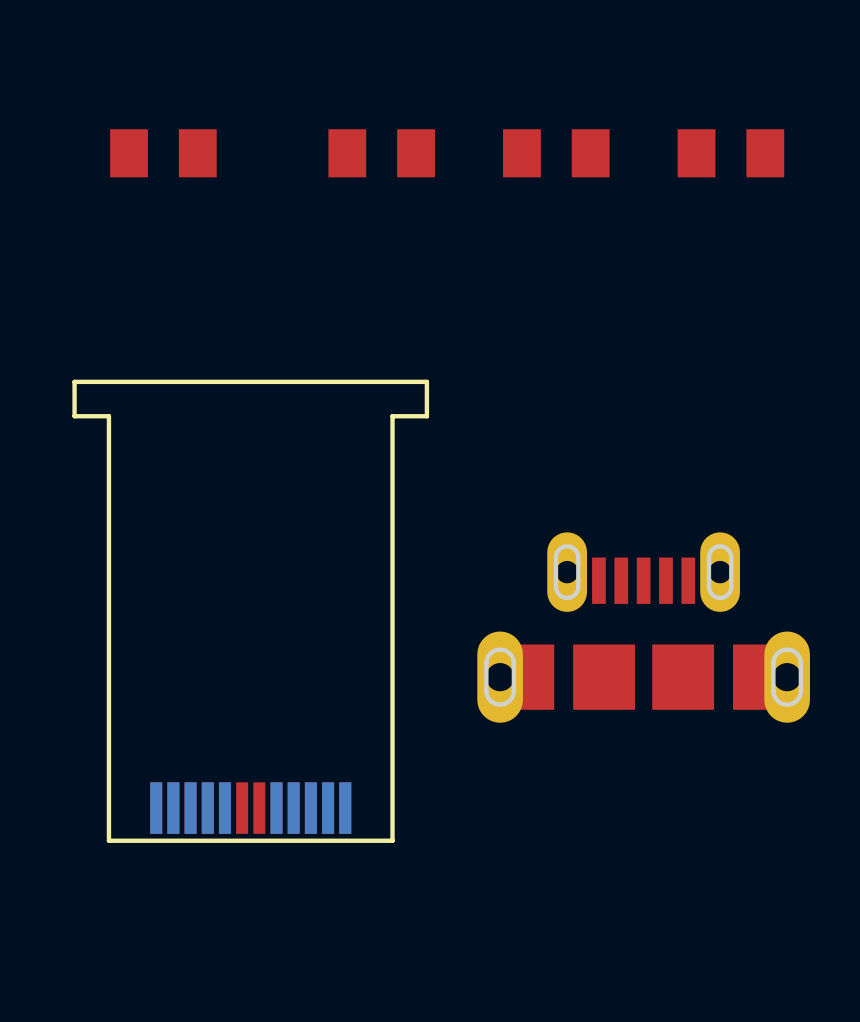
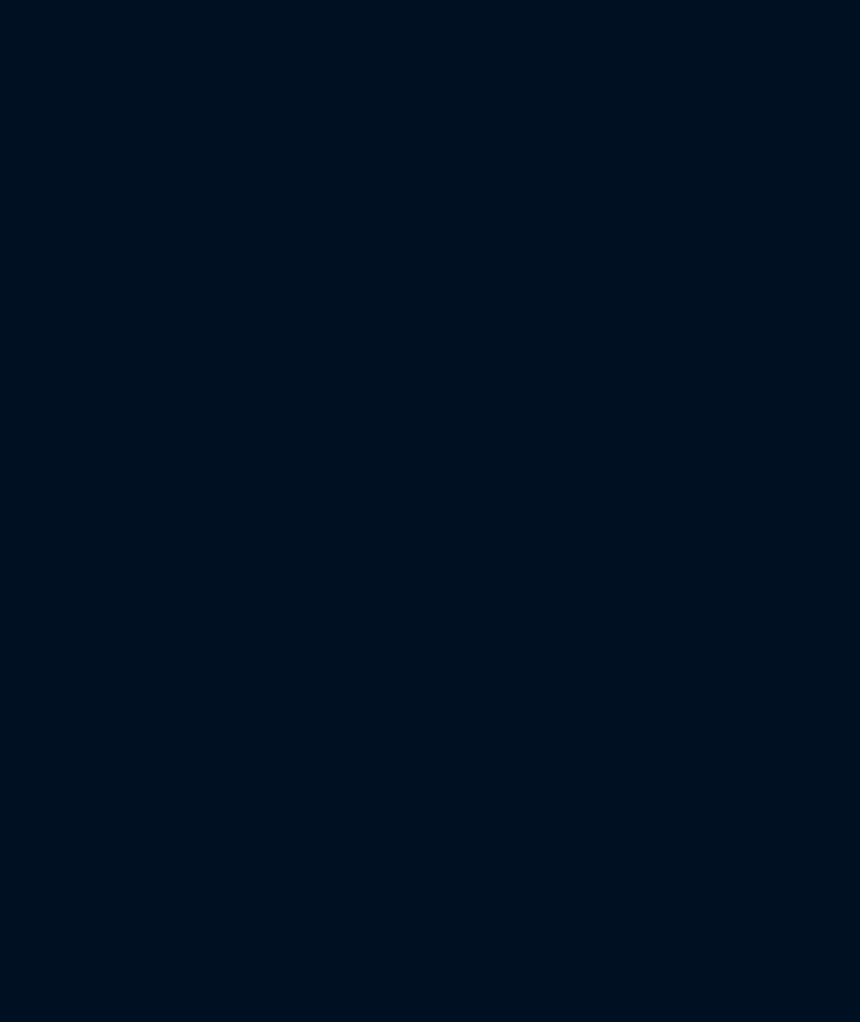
part: (163, 153) -> none
part: (381, 153) -> none
part: (556, 153) -> none
part: (730, 153) -> none
part: (250, 611) -> none
part: (643, 627) -> none

